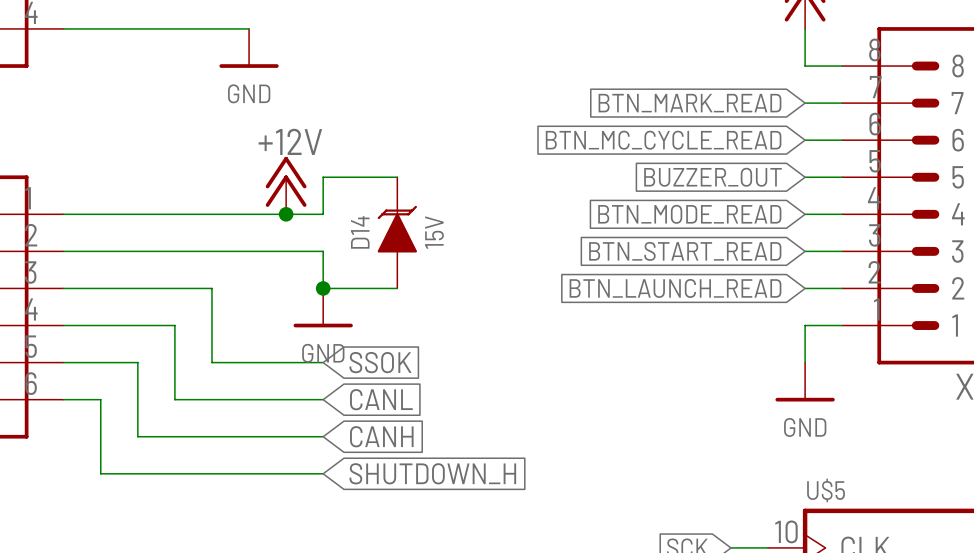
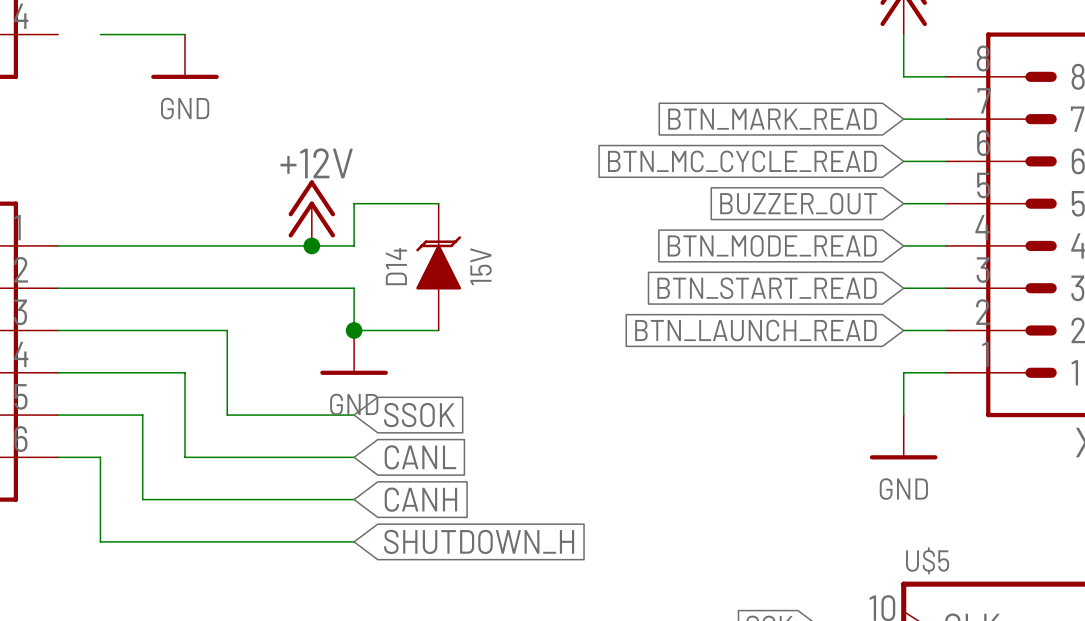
wire: (63, 28) (100, 28) -> none
wire: (174, 28) (249, 28) -> none
power symbol position: GND (249, 48) -> GND (184, 56)

